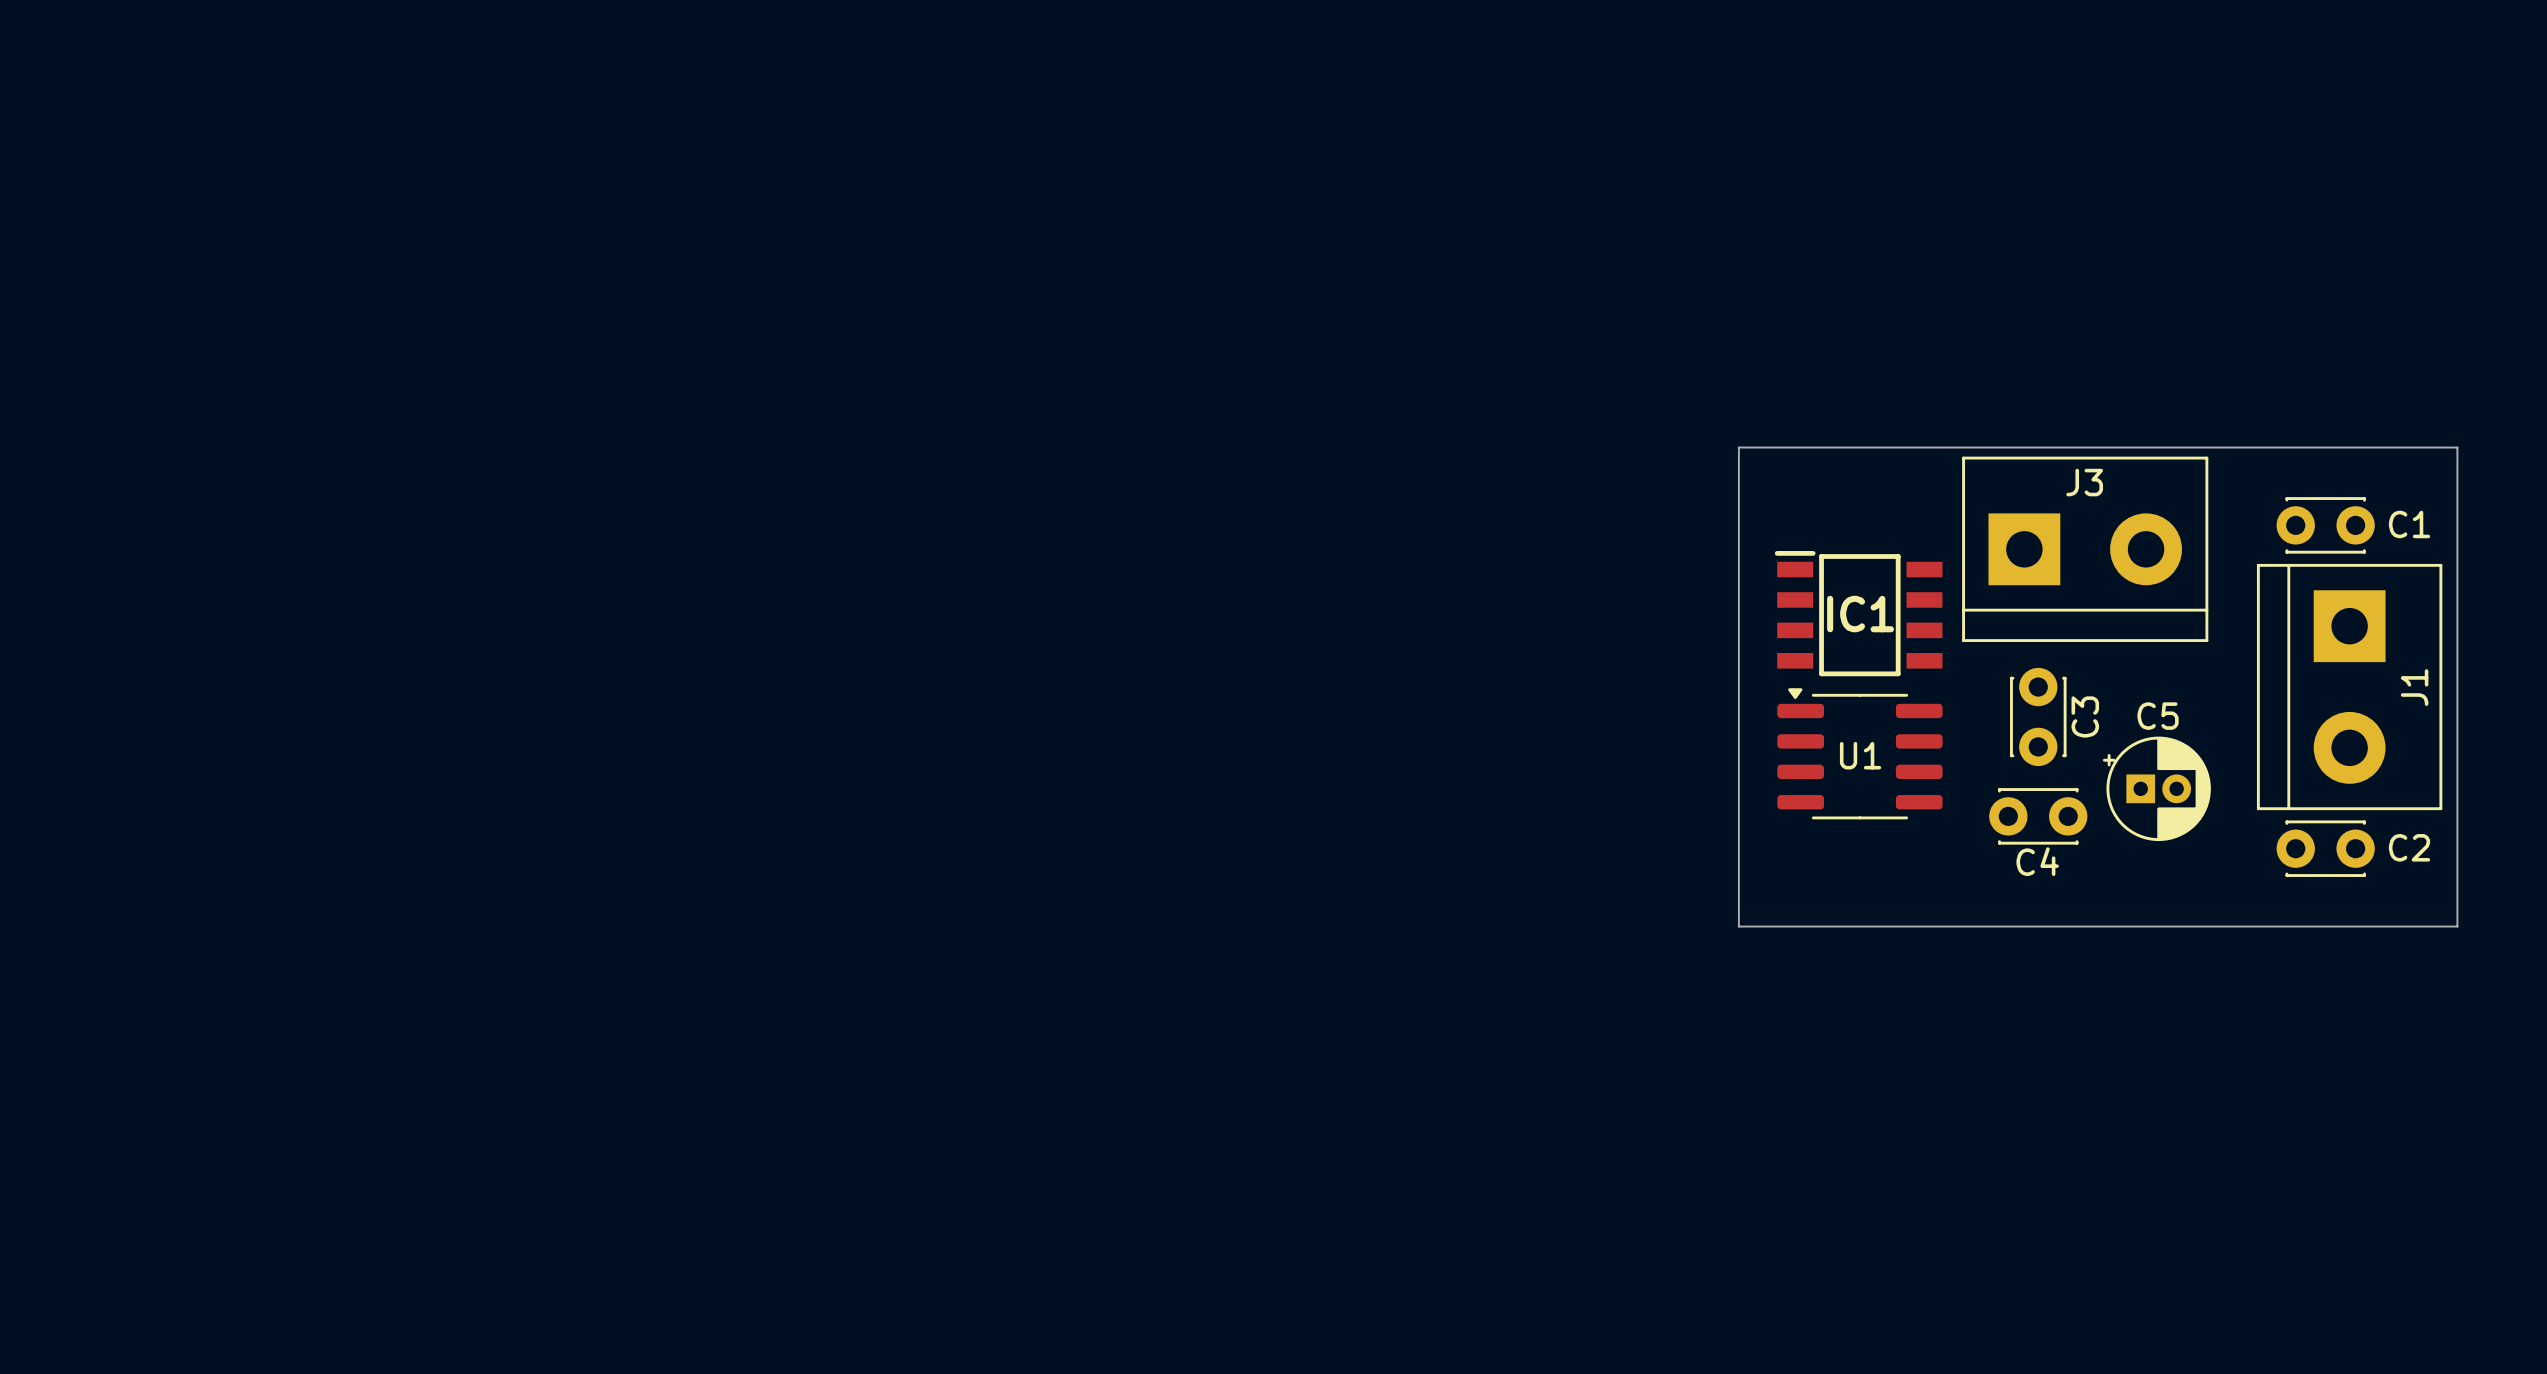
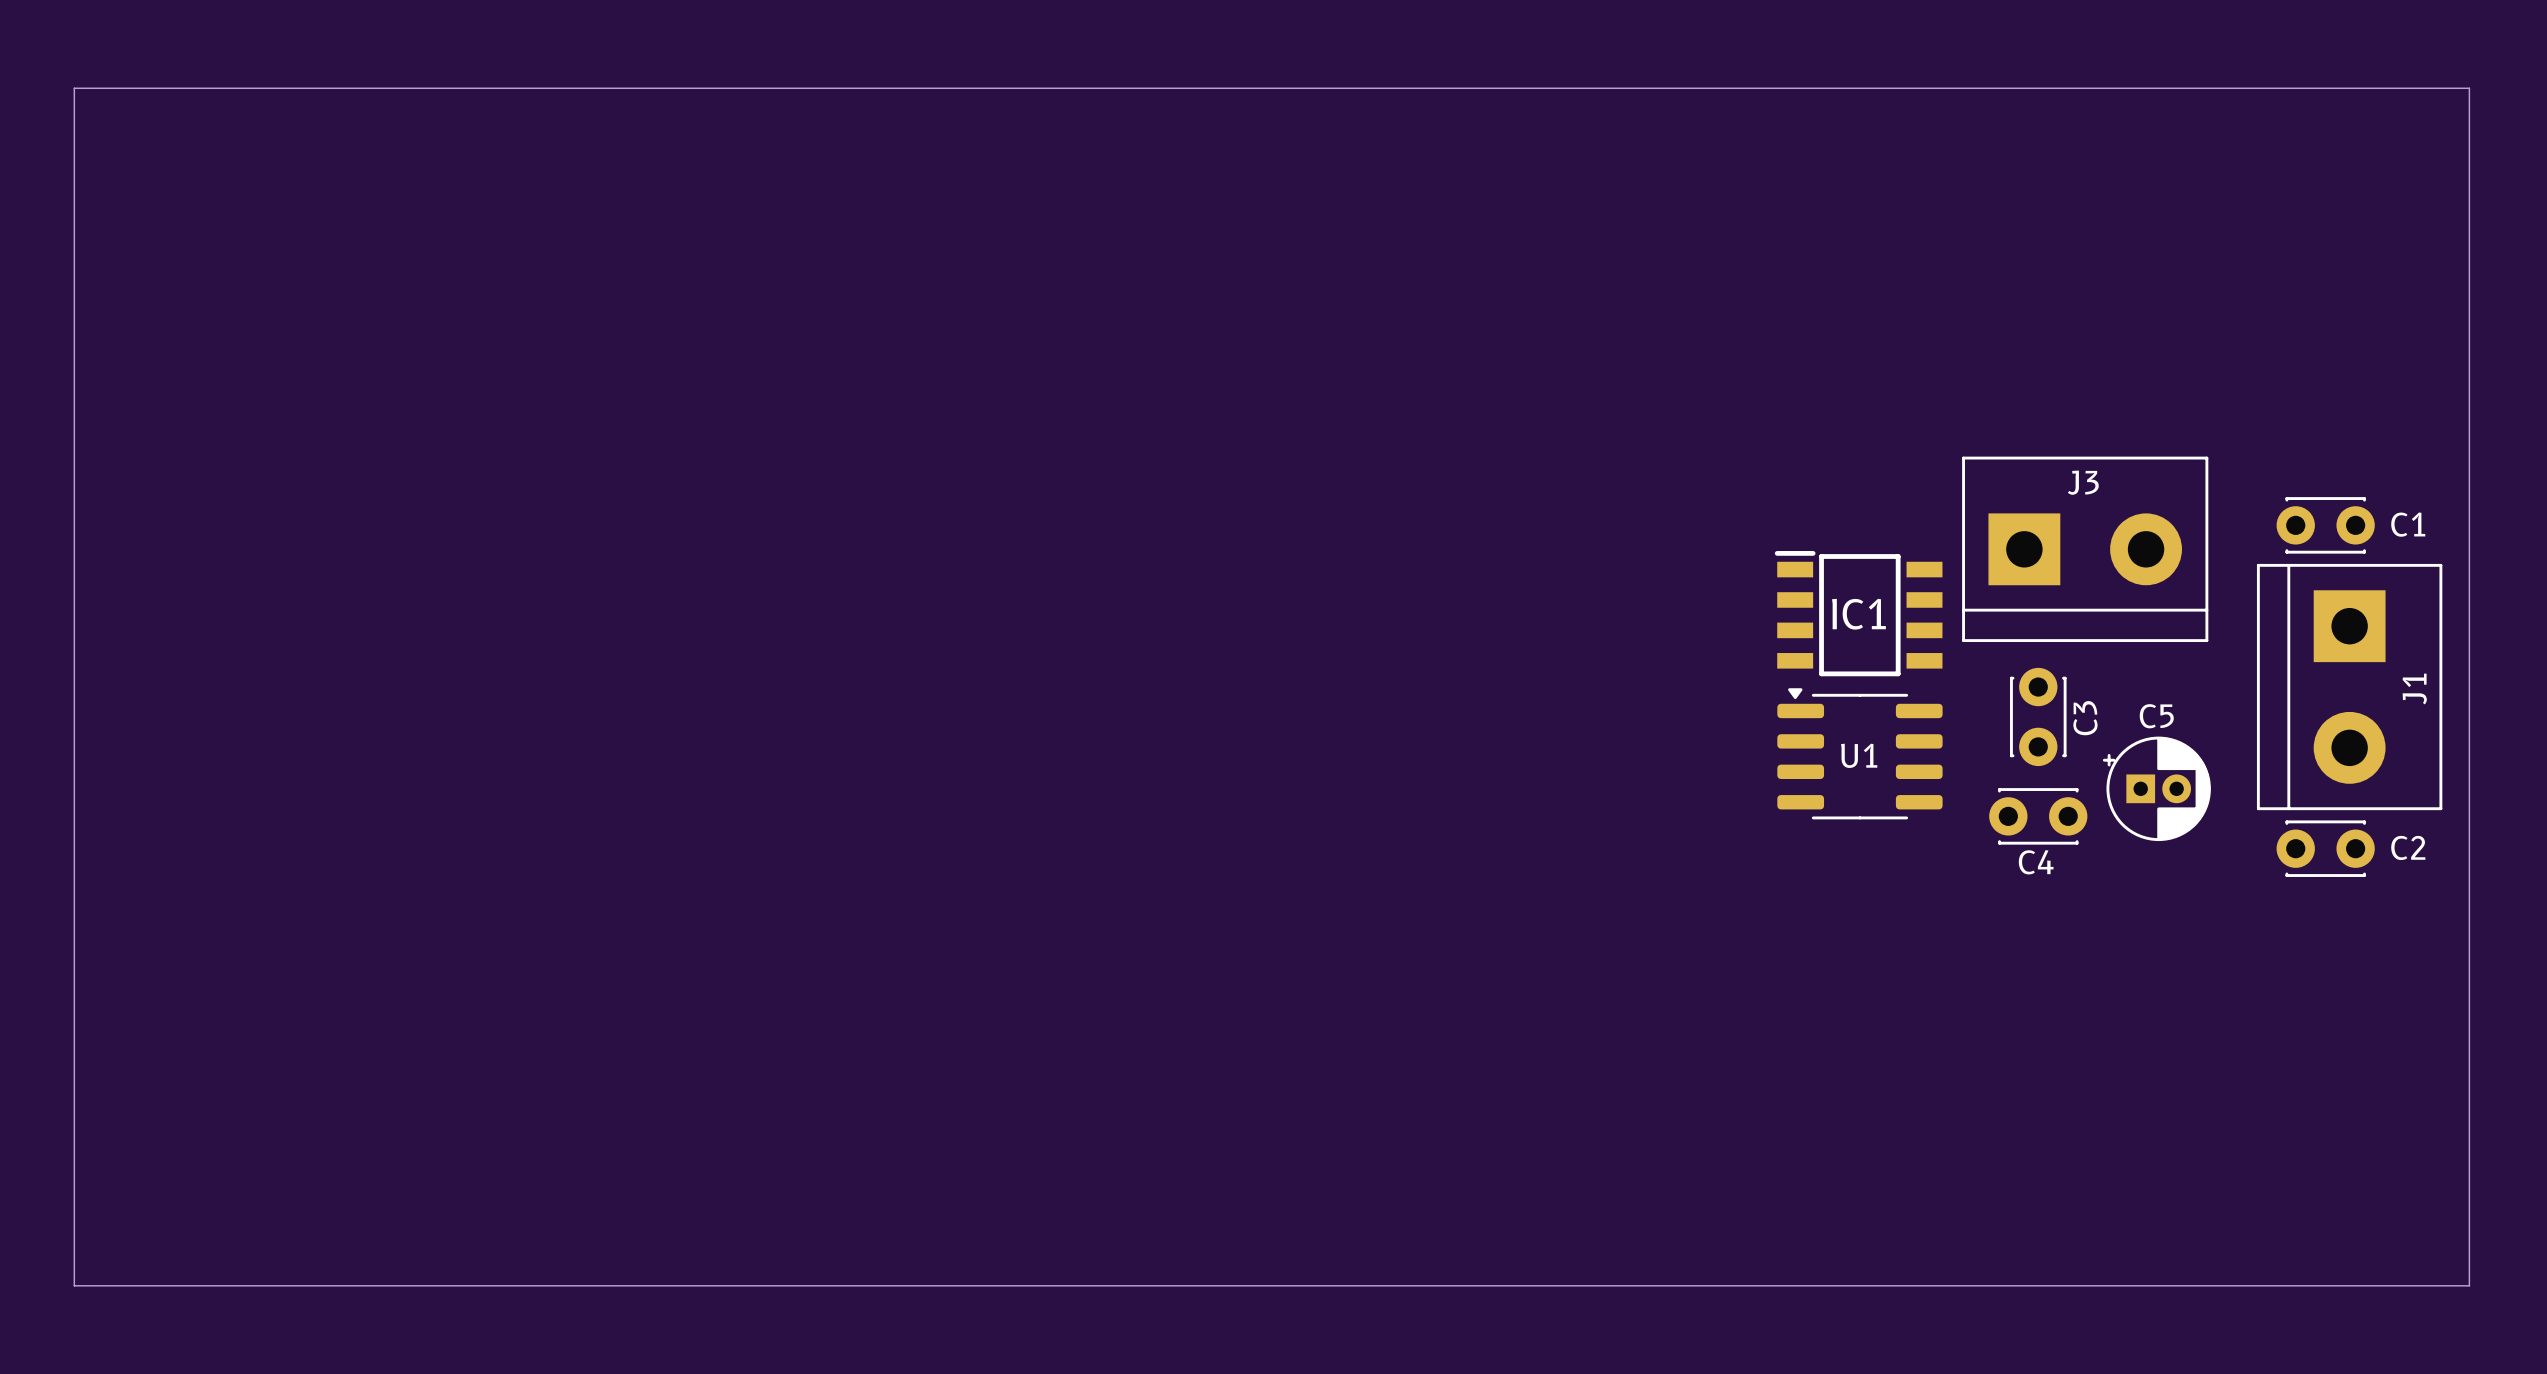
line: none -> (74, 88) (2469, 88) (2469, 1285) (74, 1285) (74, 88)
line: (1738, 447) (2457, 447) (2457, 926) (1738, 926) (1738, 447) -> none

